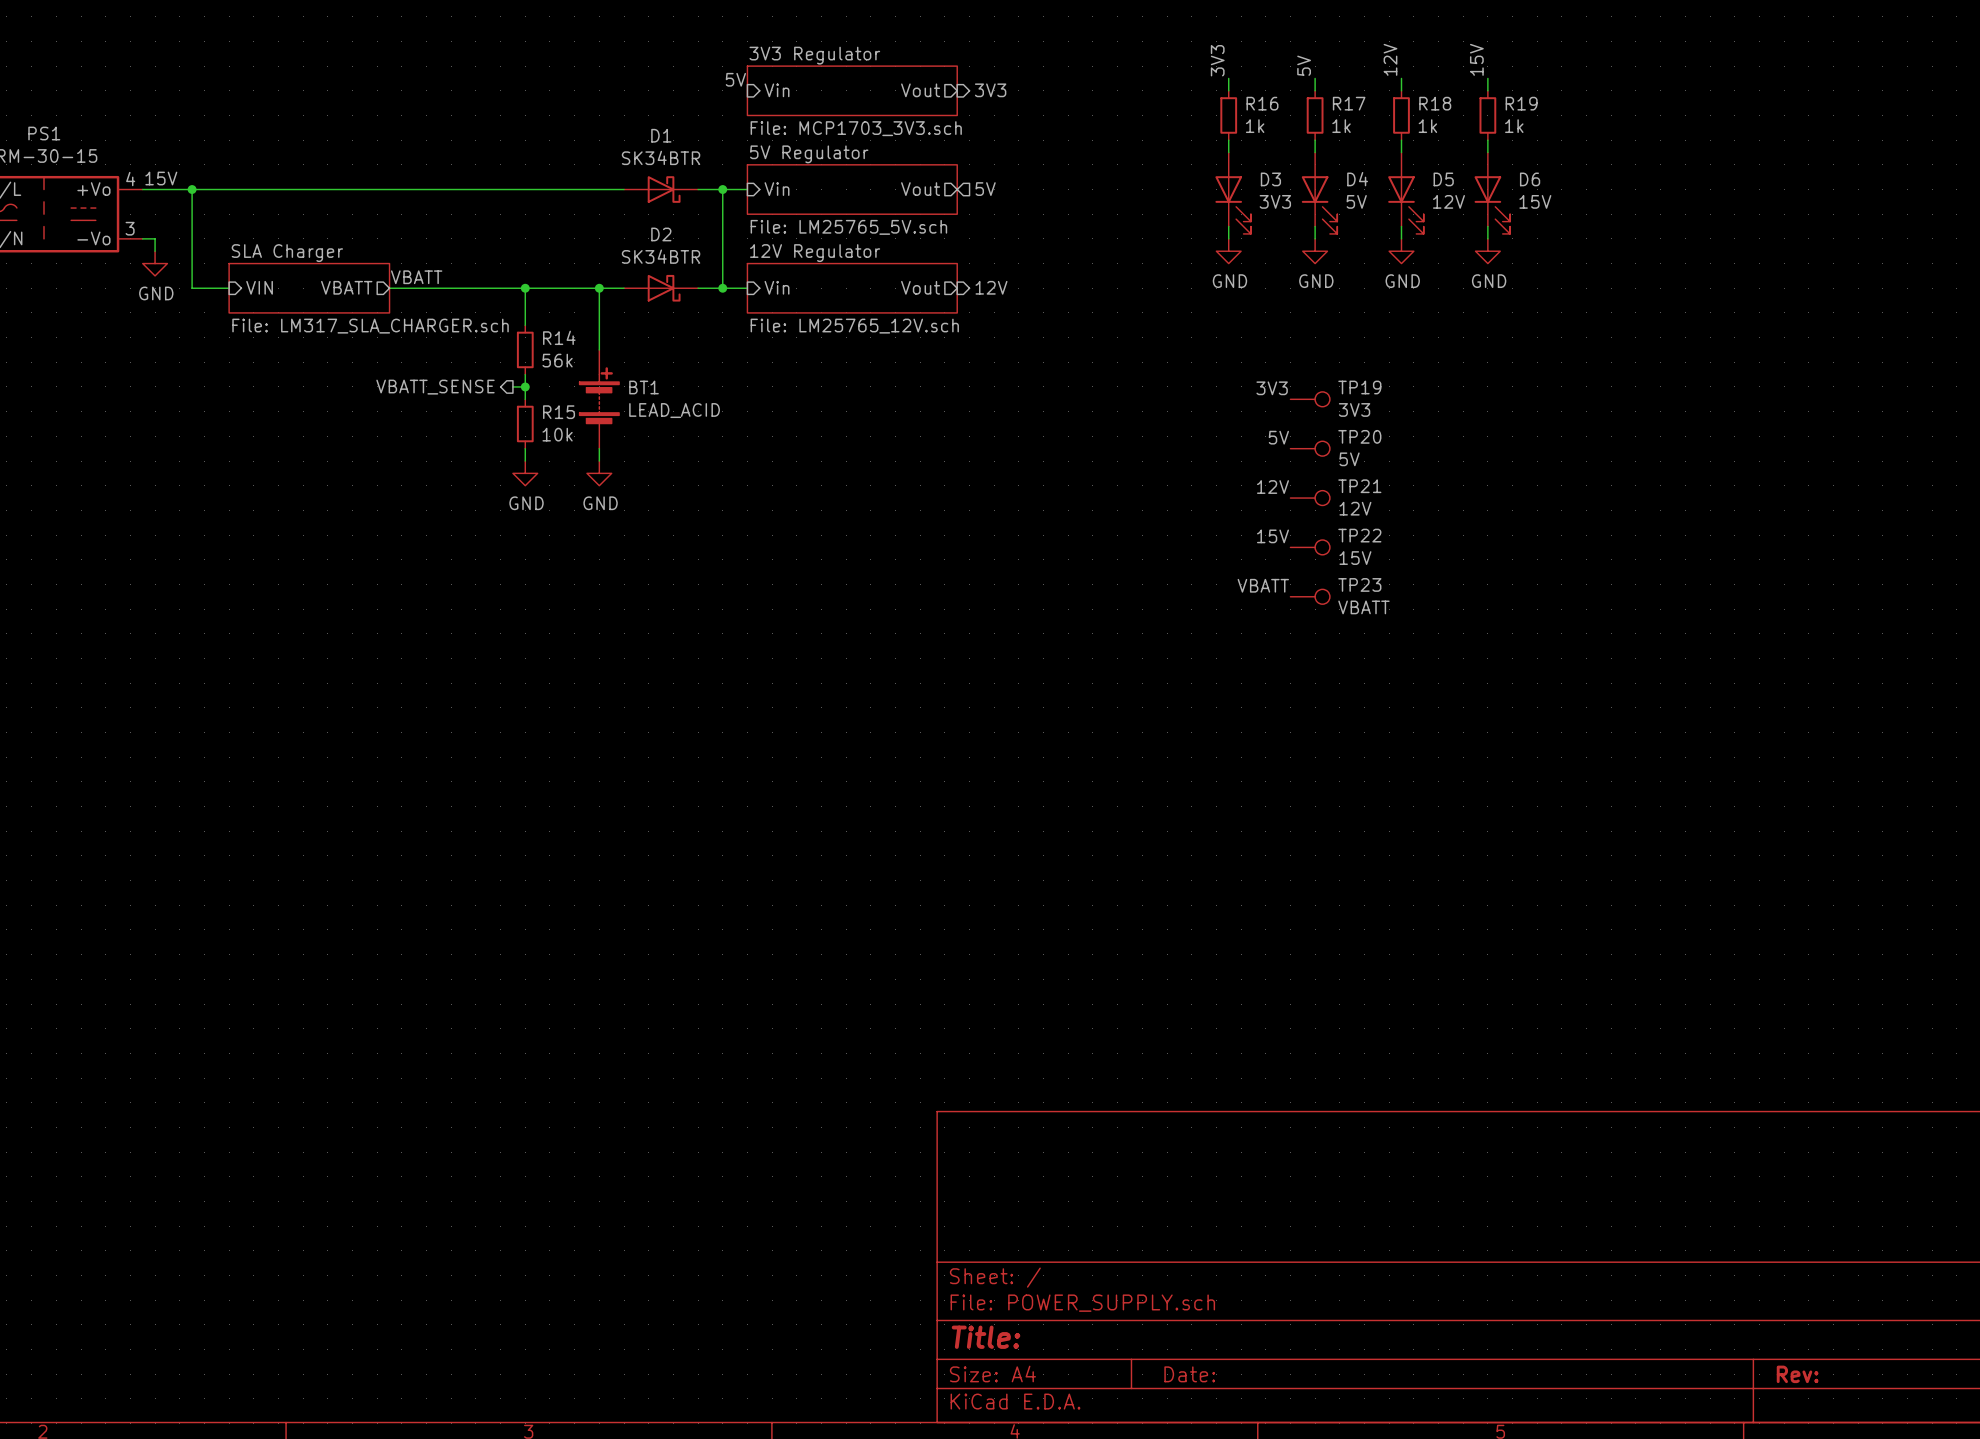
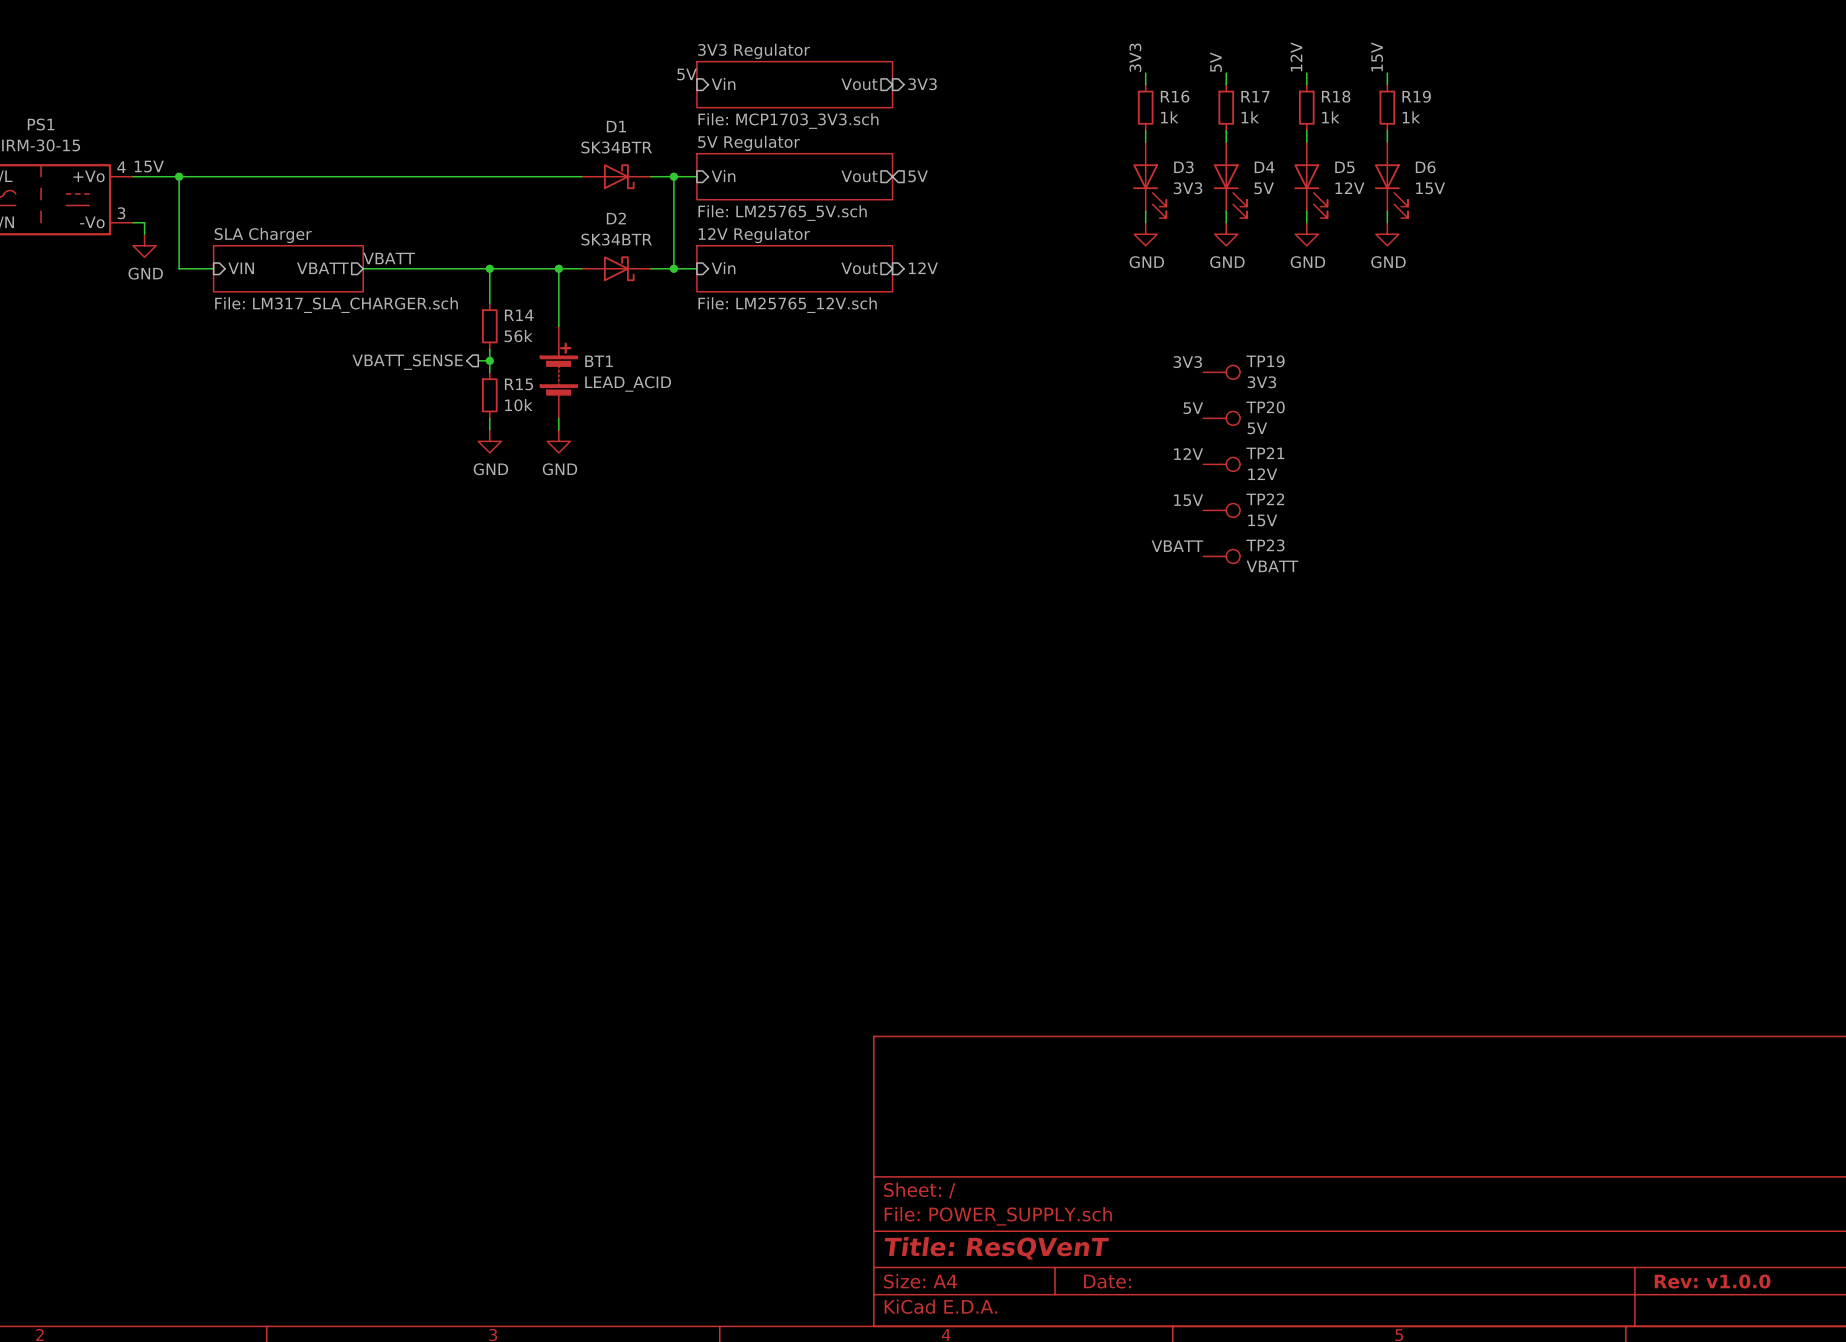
title block: Title: (986, 1337) -> Title: ResQVenT (996, 1248)
title block: Rev: (1797, 1374) -> Rev: v1.0.0 (1712, 1281)

